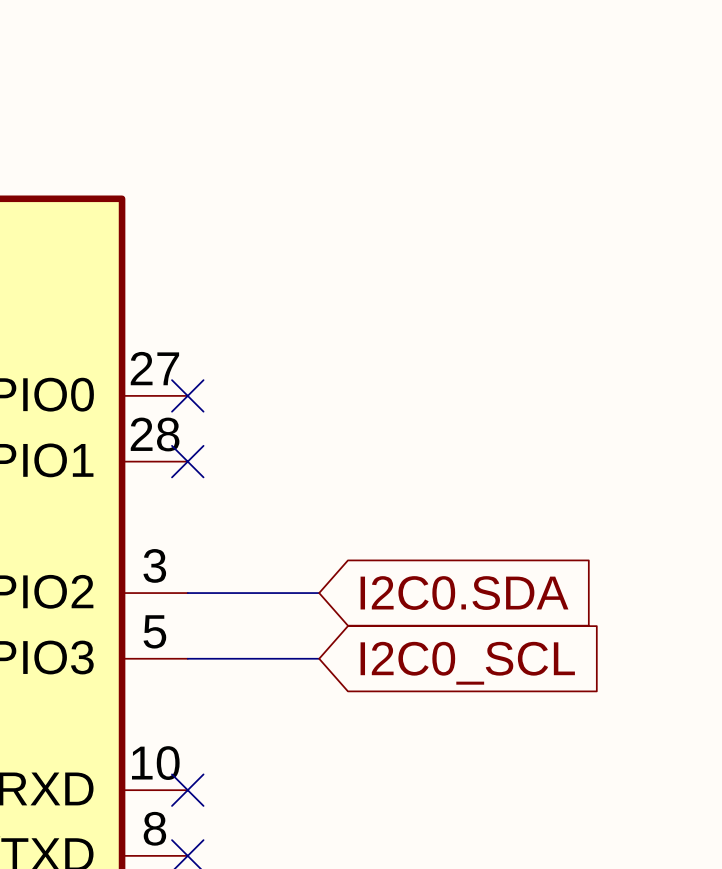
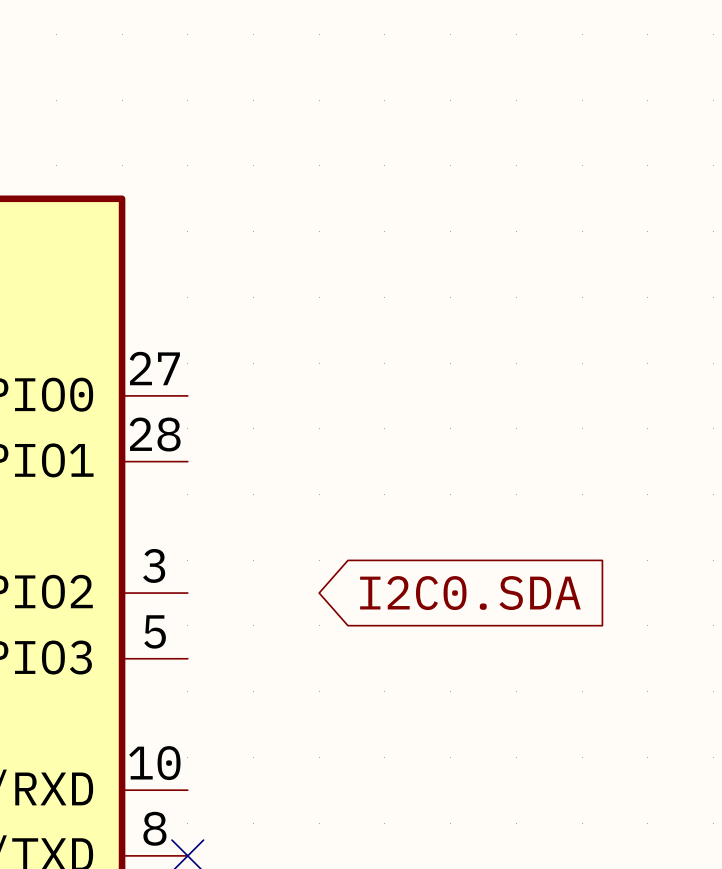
no-connect mark: (187, 395) -> none
no-connect mark: (187, 461) -> none
wire: (187, 593) (319, 593) -> none
wire: (187, 658) (319, 658) -> none
global label: I2C0_SCL (467, 663) -> none
no-connect mark: (187, 790) -> none

